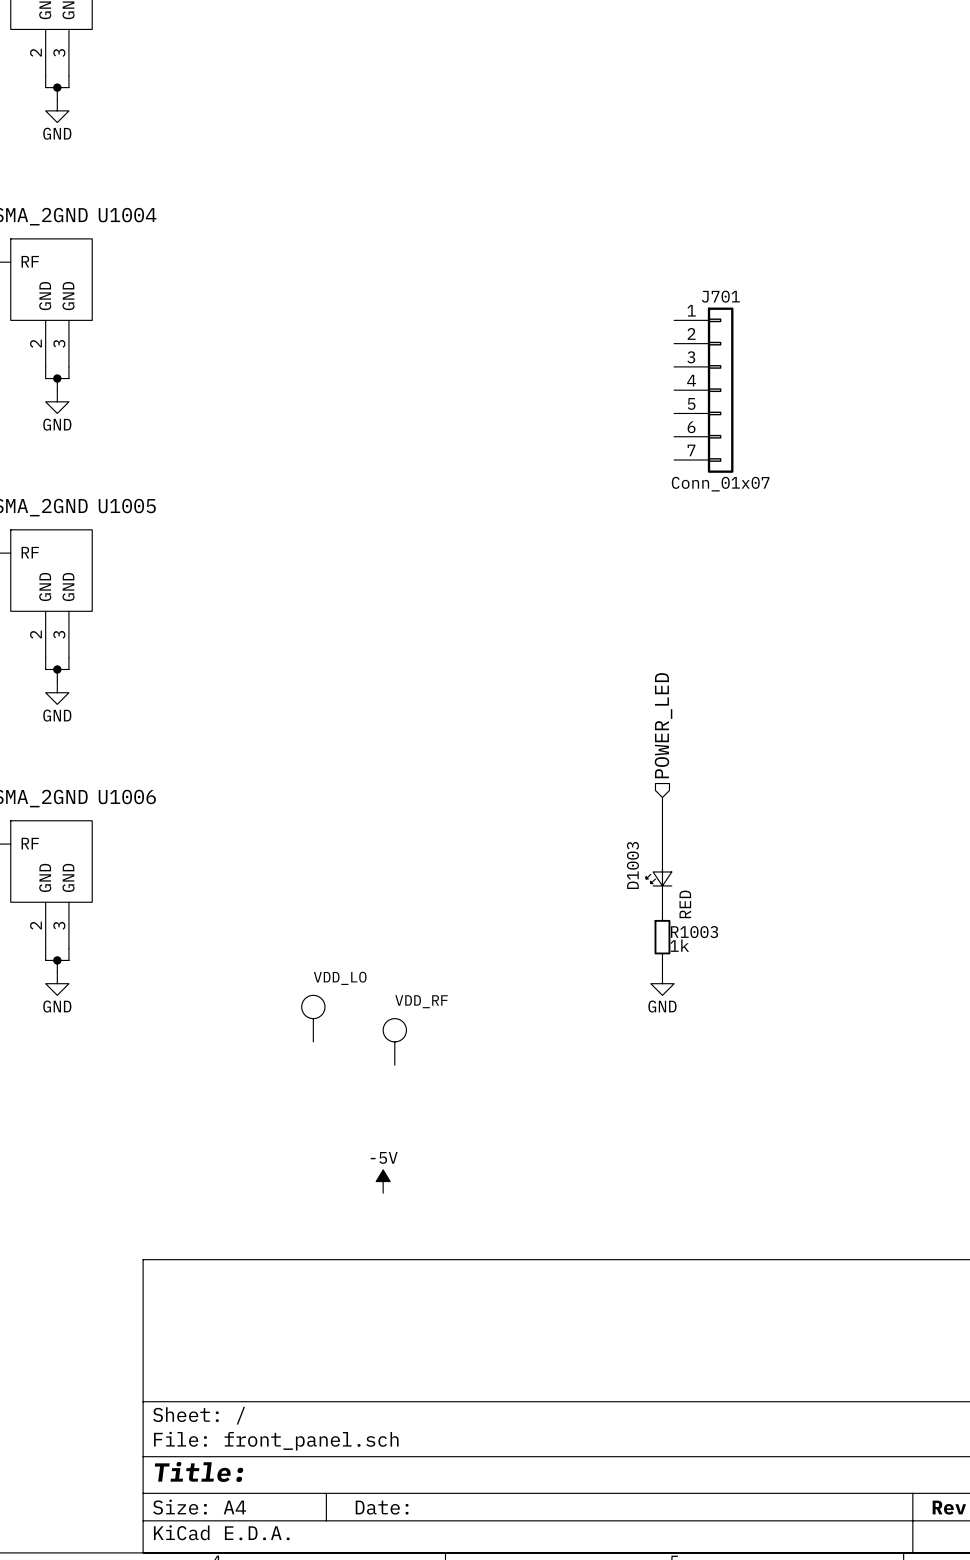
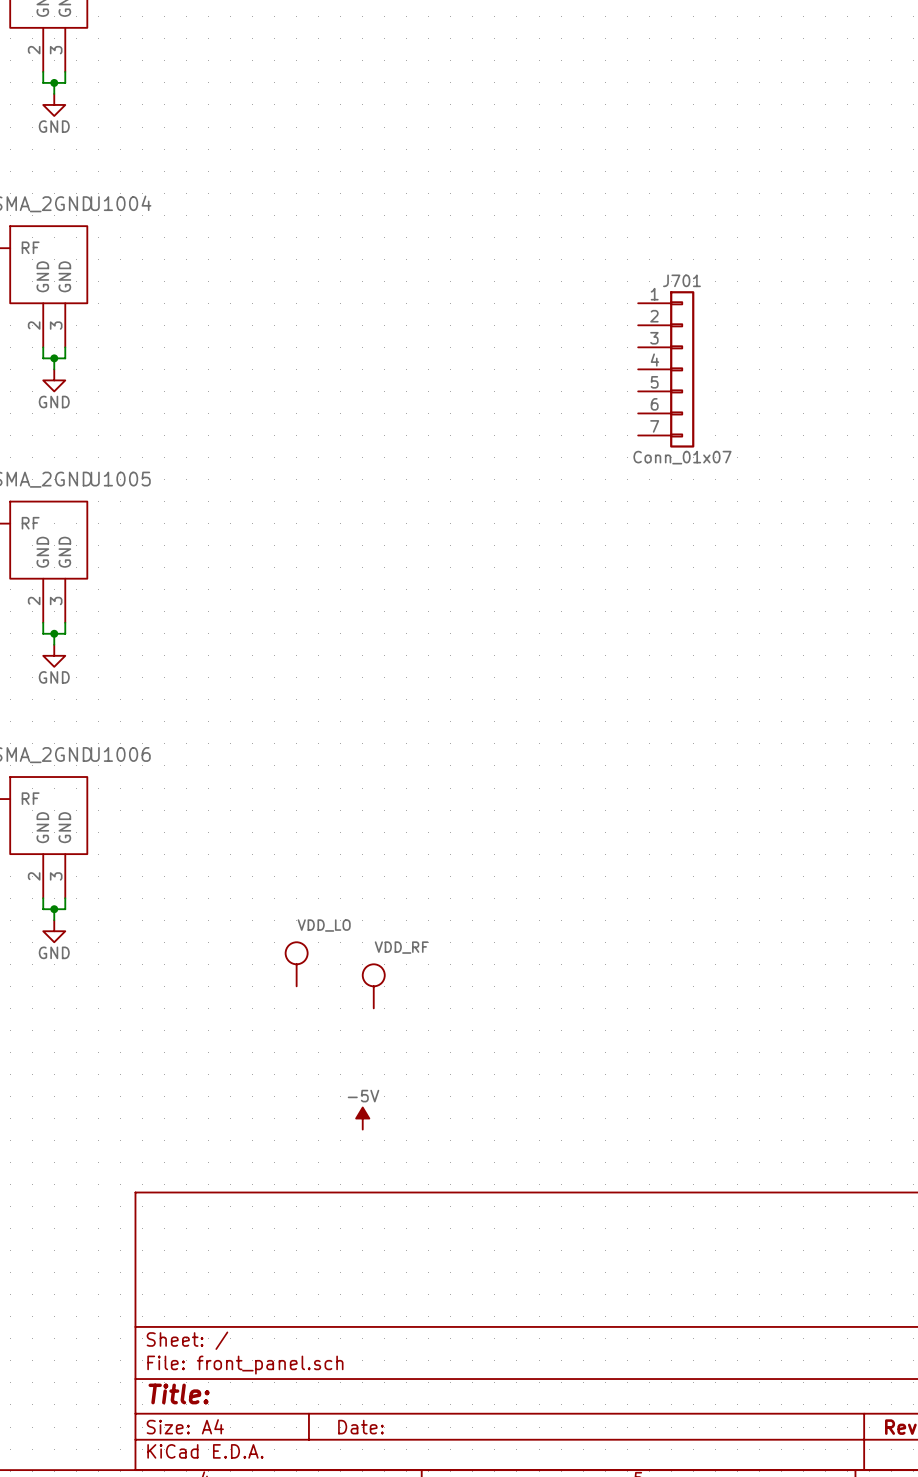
hierarchical label: POWER_LED (663, 725) -> none
wire: (662, 797) (662, 855) -> none
D1003: RED (658, 878) -> none
wire: (662, 902) (662, 913) -> none
R1003: 1k (662, 937) -> none
wire: (662, 960) (662, 972) -> none
power symbol: GND (662, 983) -> none

